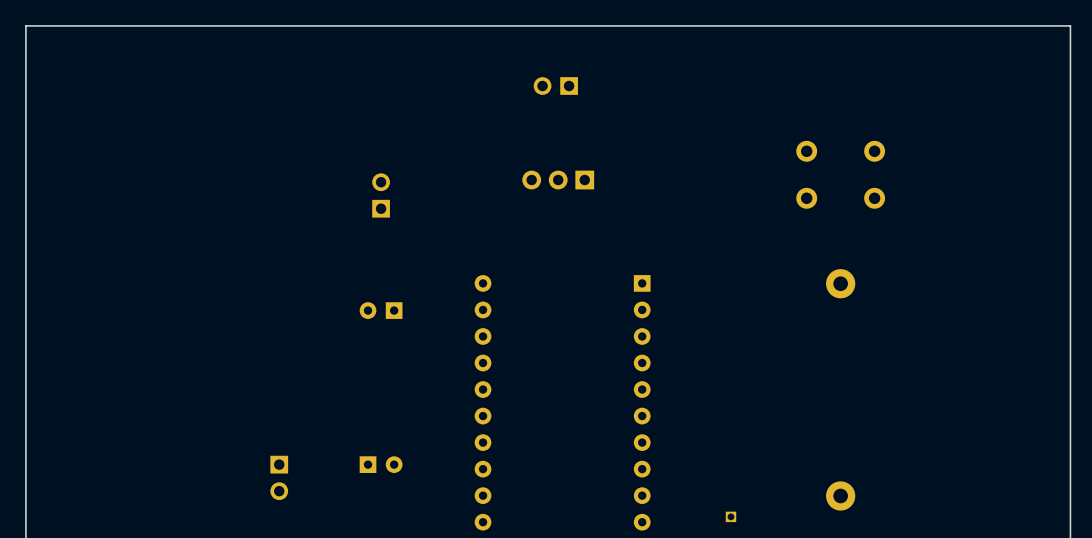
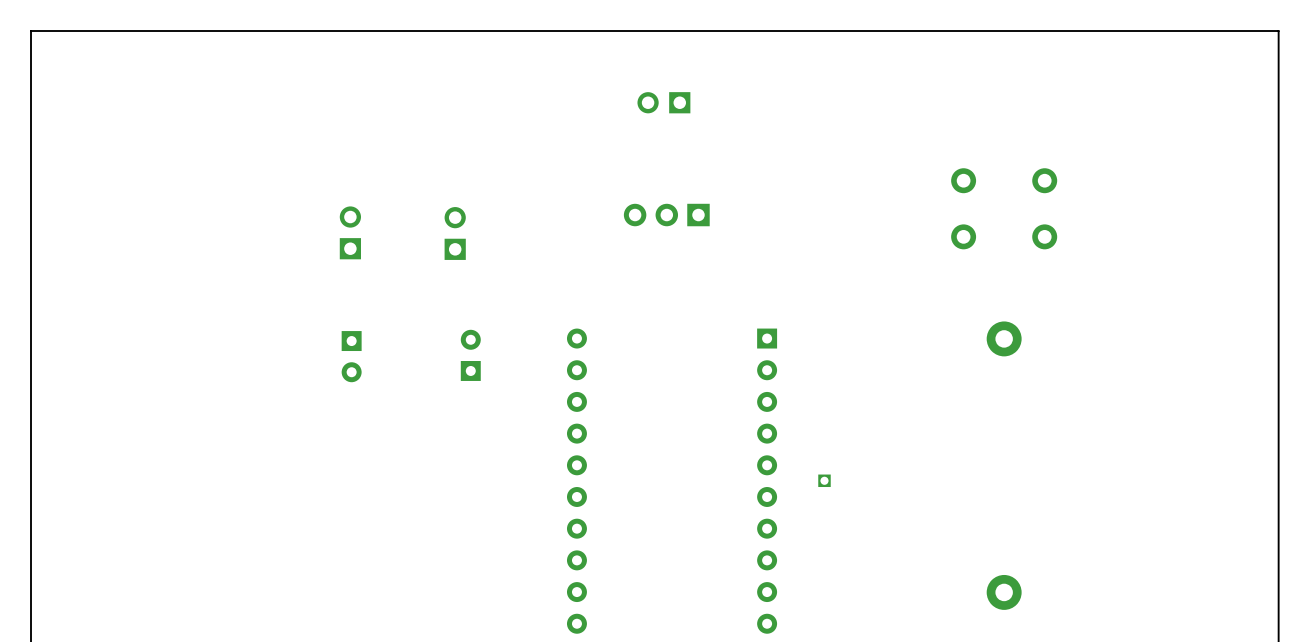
part: none -> (350, 232)
part: none -> (351, 356)
part rotation: 0° (381, 310) -> 90° clockwise (470, 355)
part: (381, 464) -> none
part: (279, 477) -> none
part position: (730, 516) -> (824, 480)

